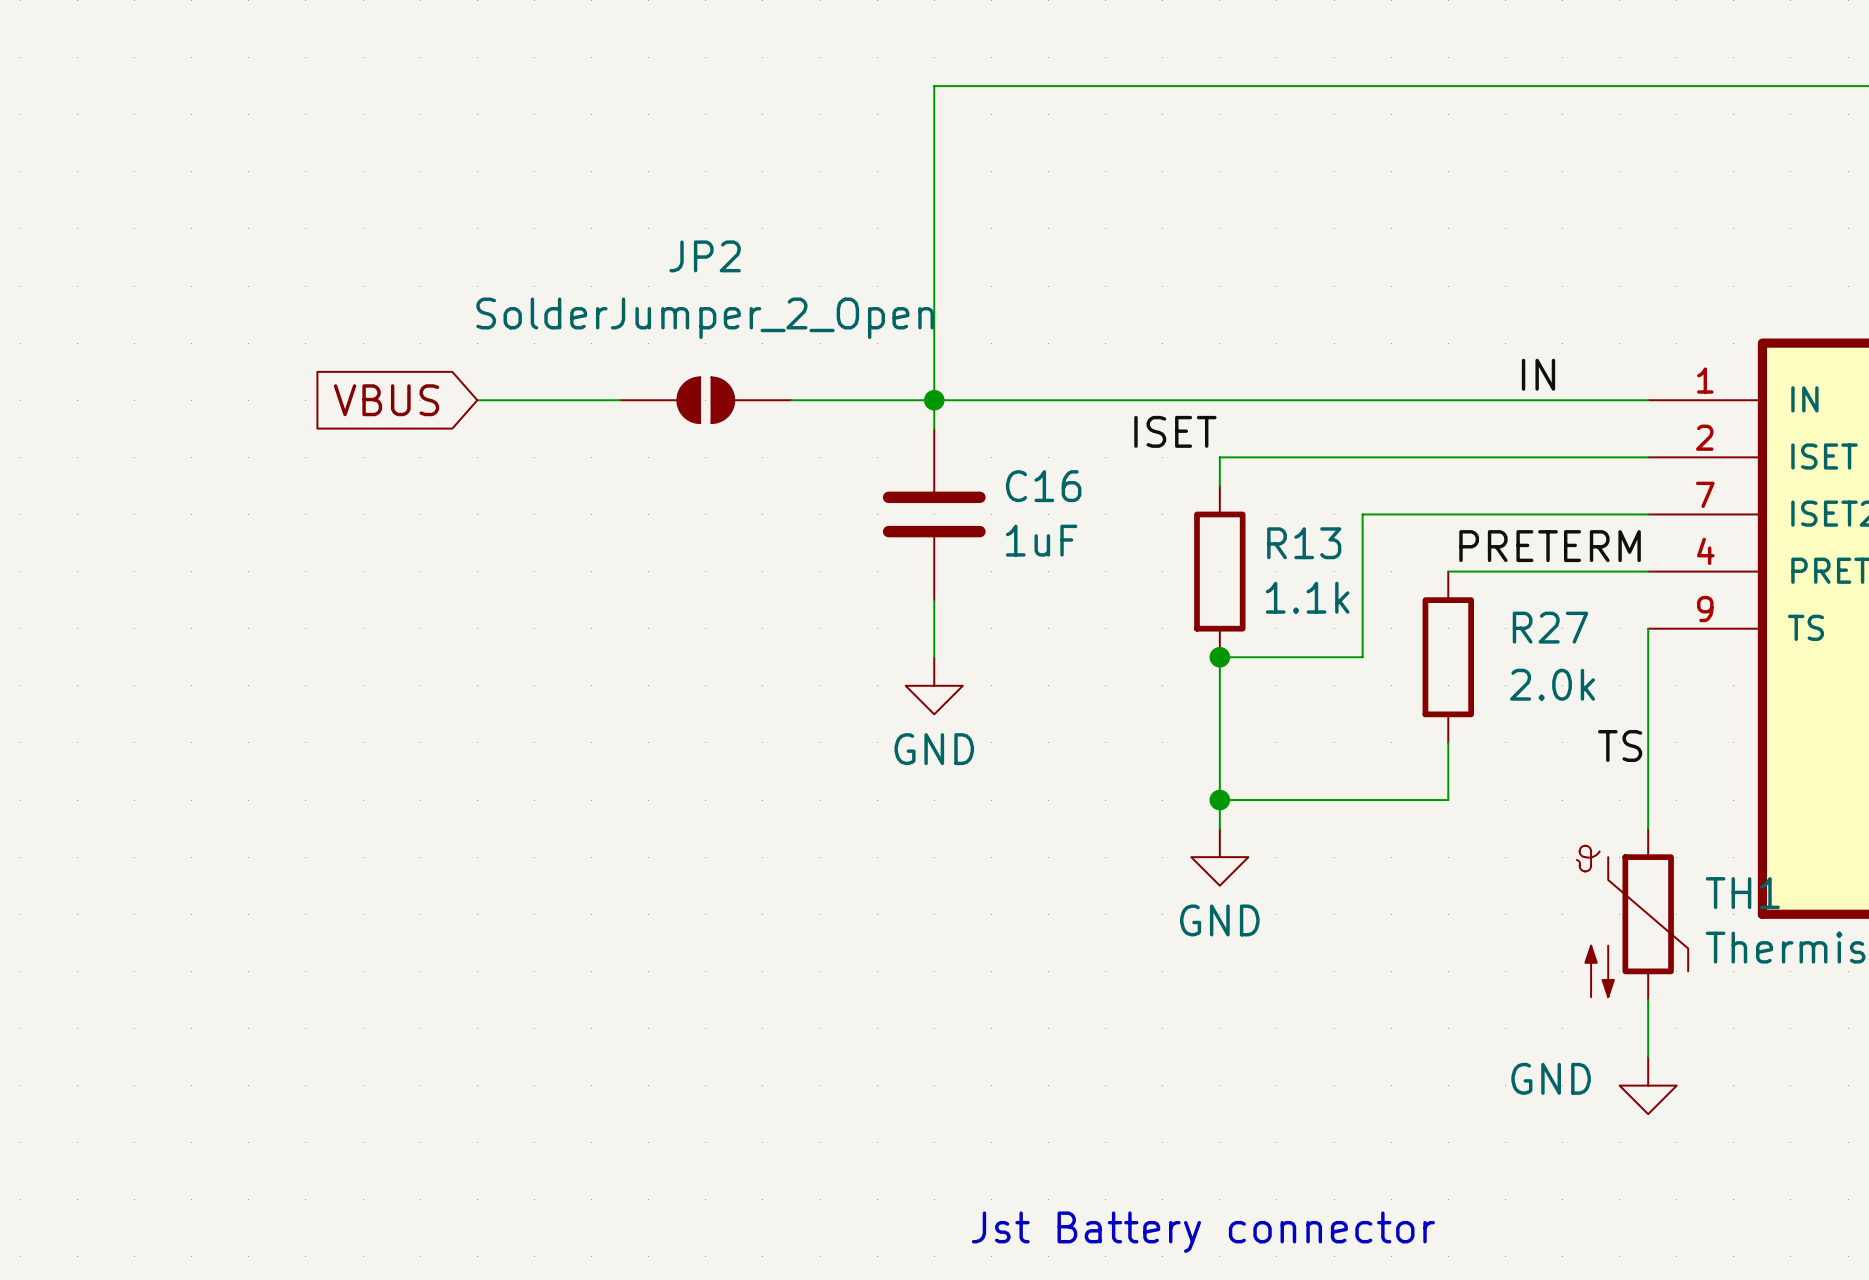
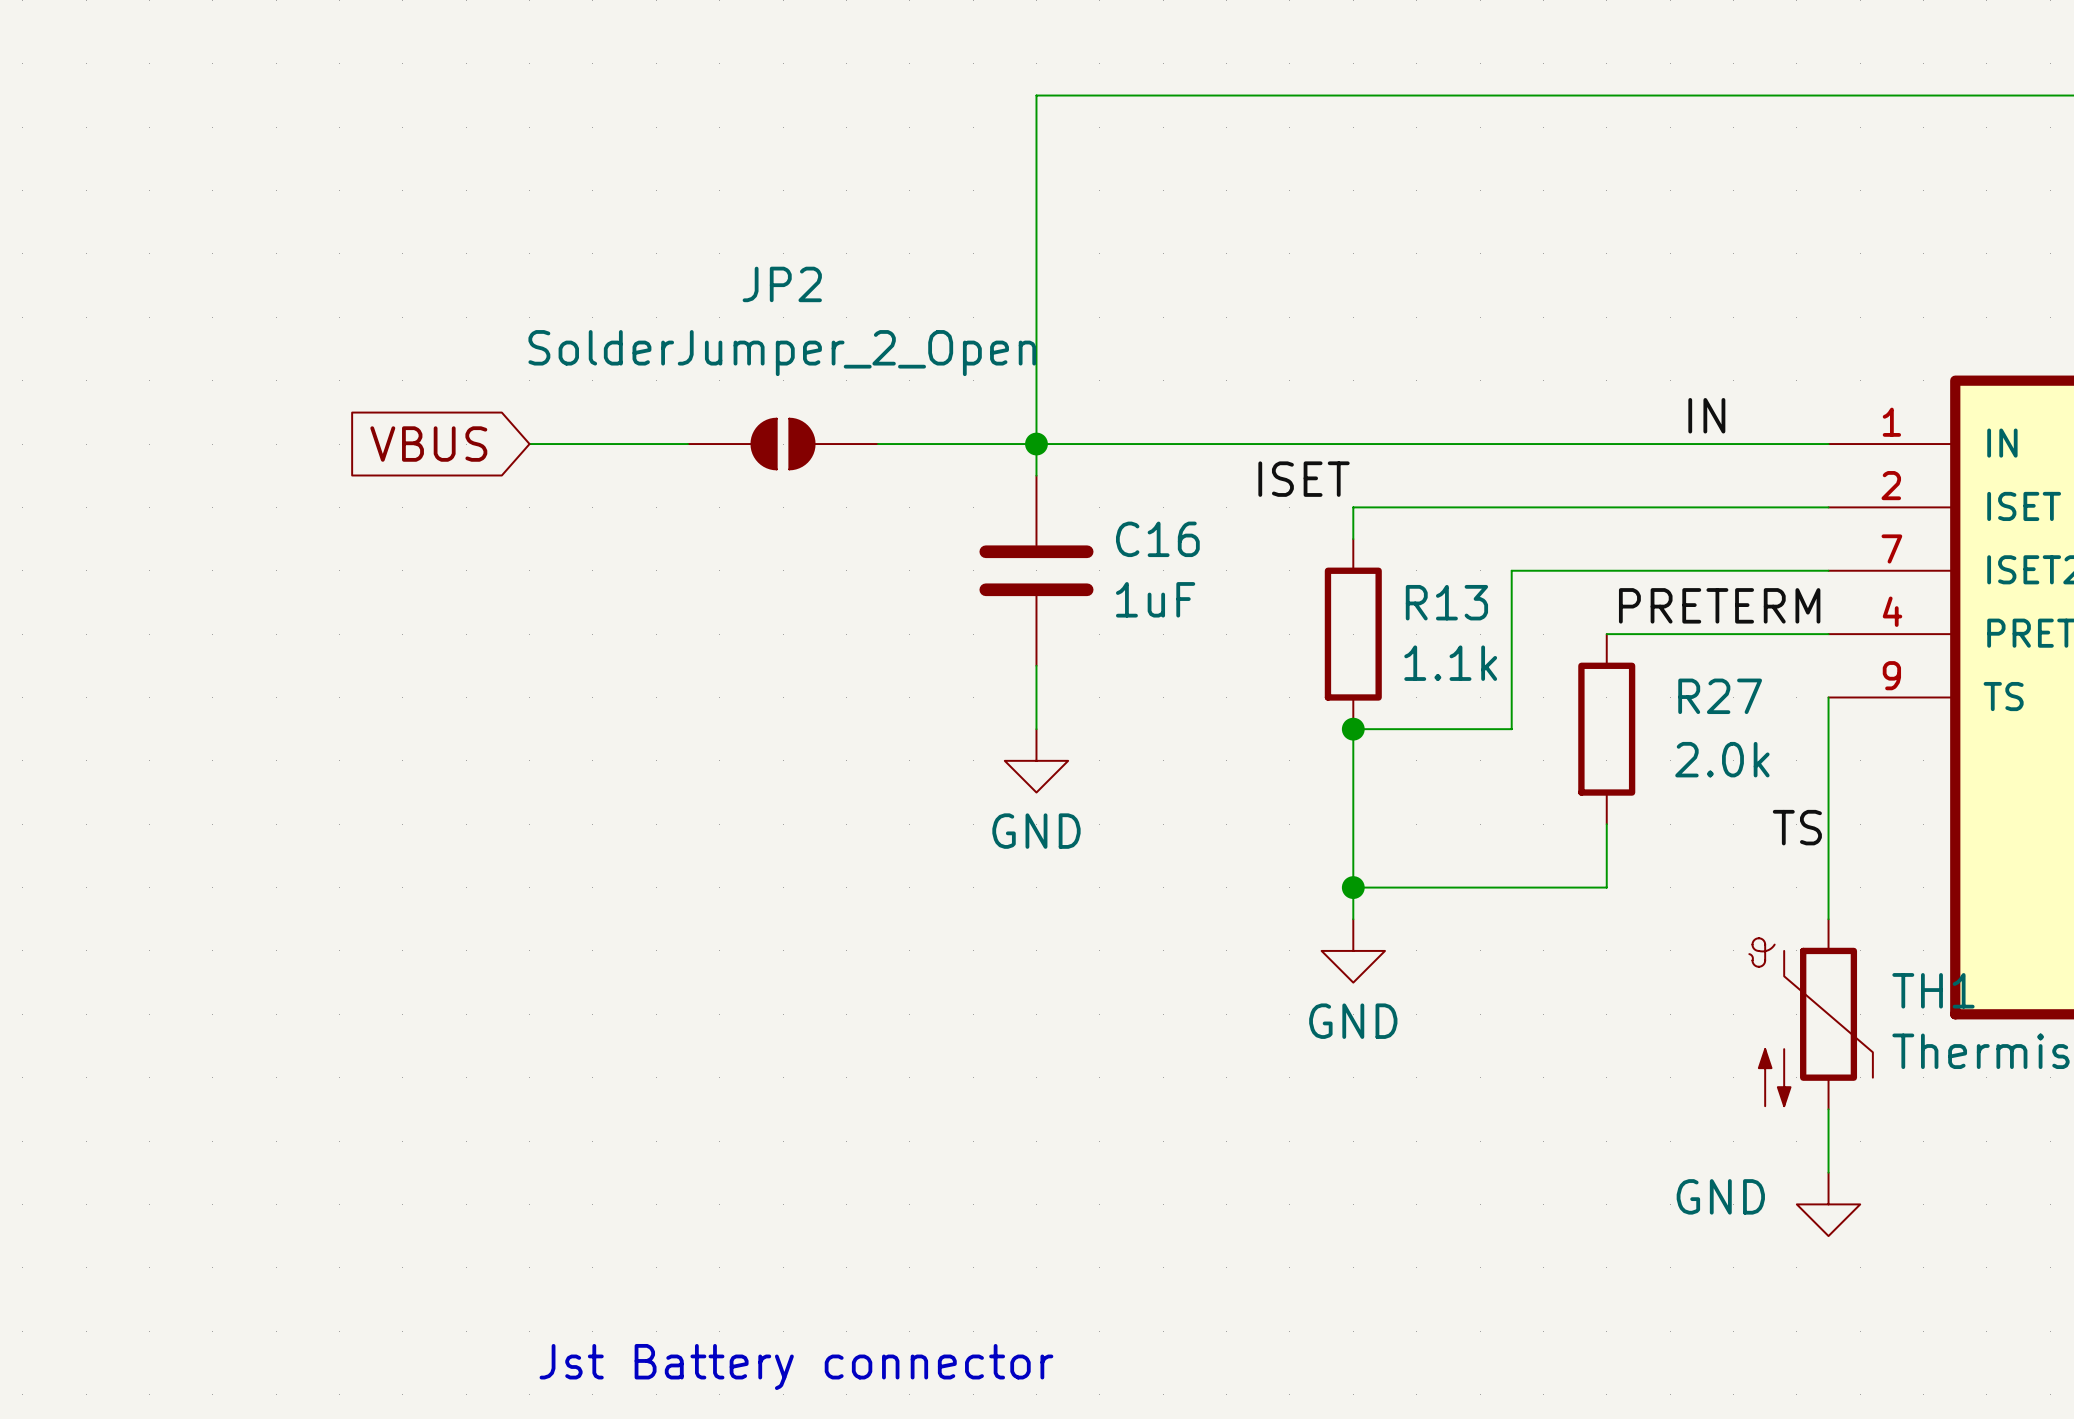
text position: Jst Battery connector (1203, 1232) -> Jst Battery connector (796, 1367)

